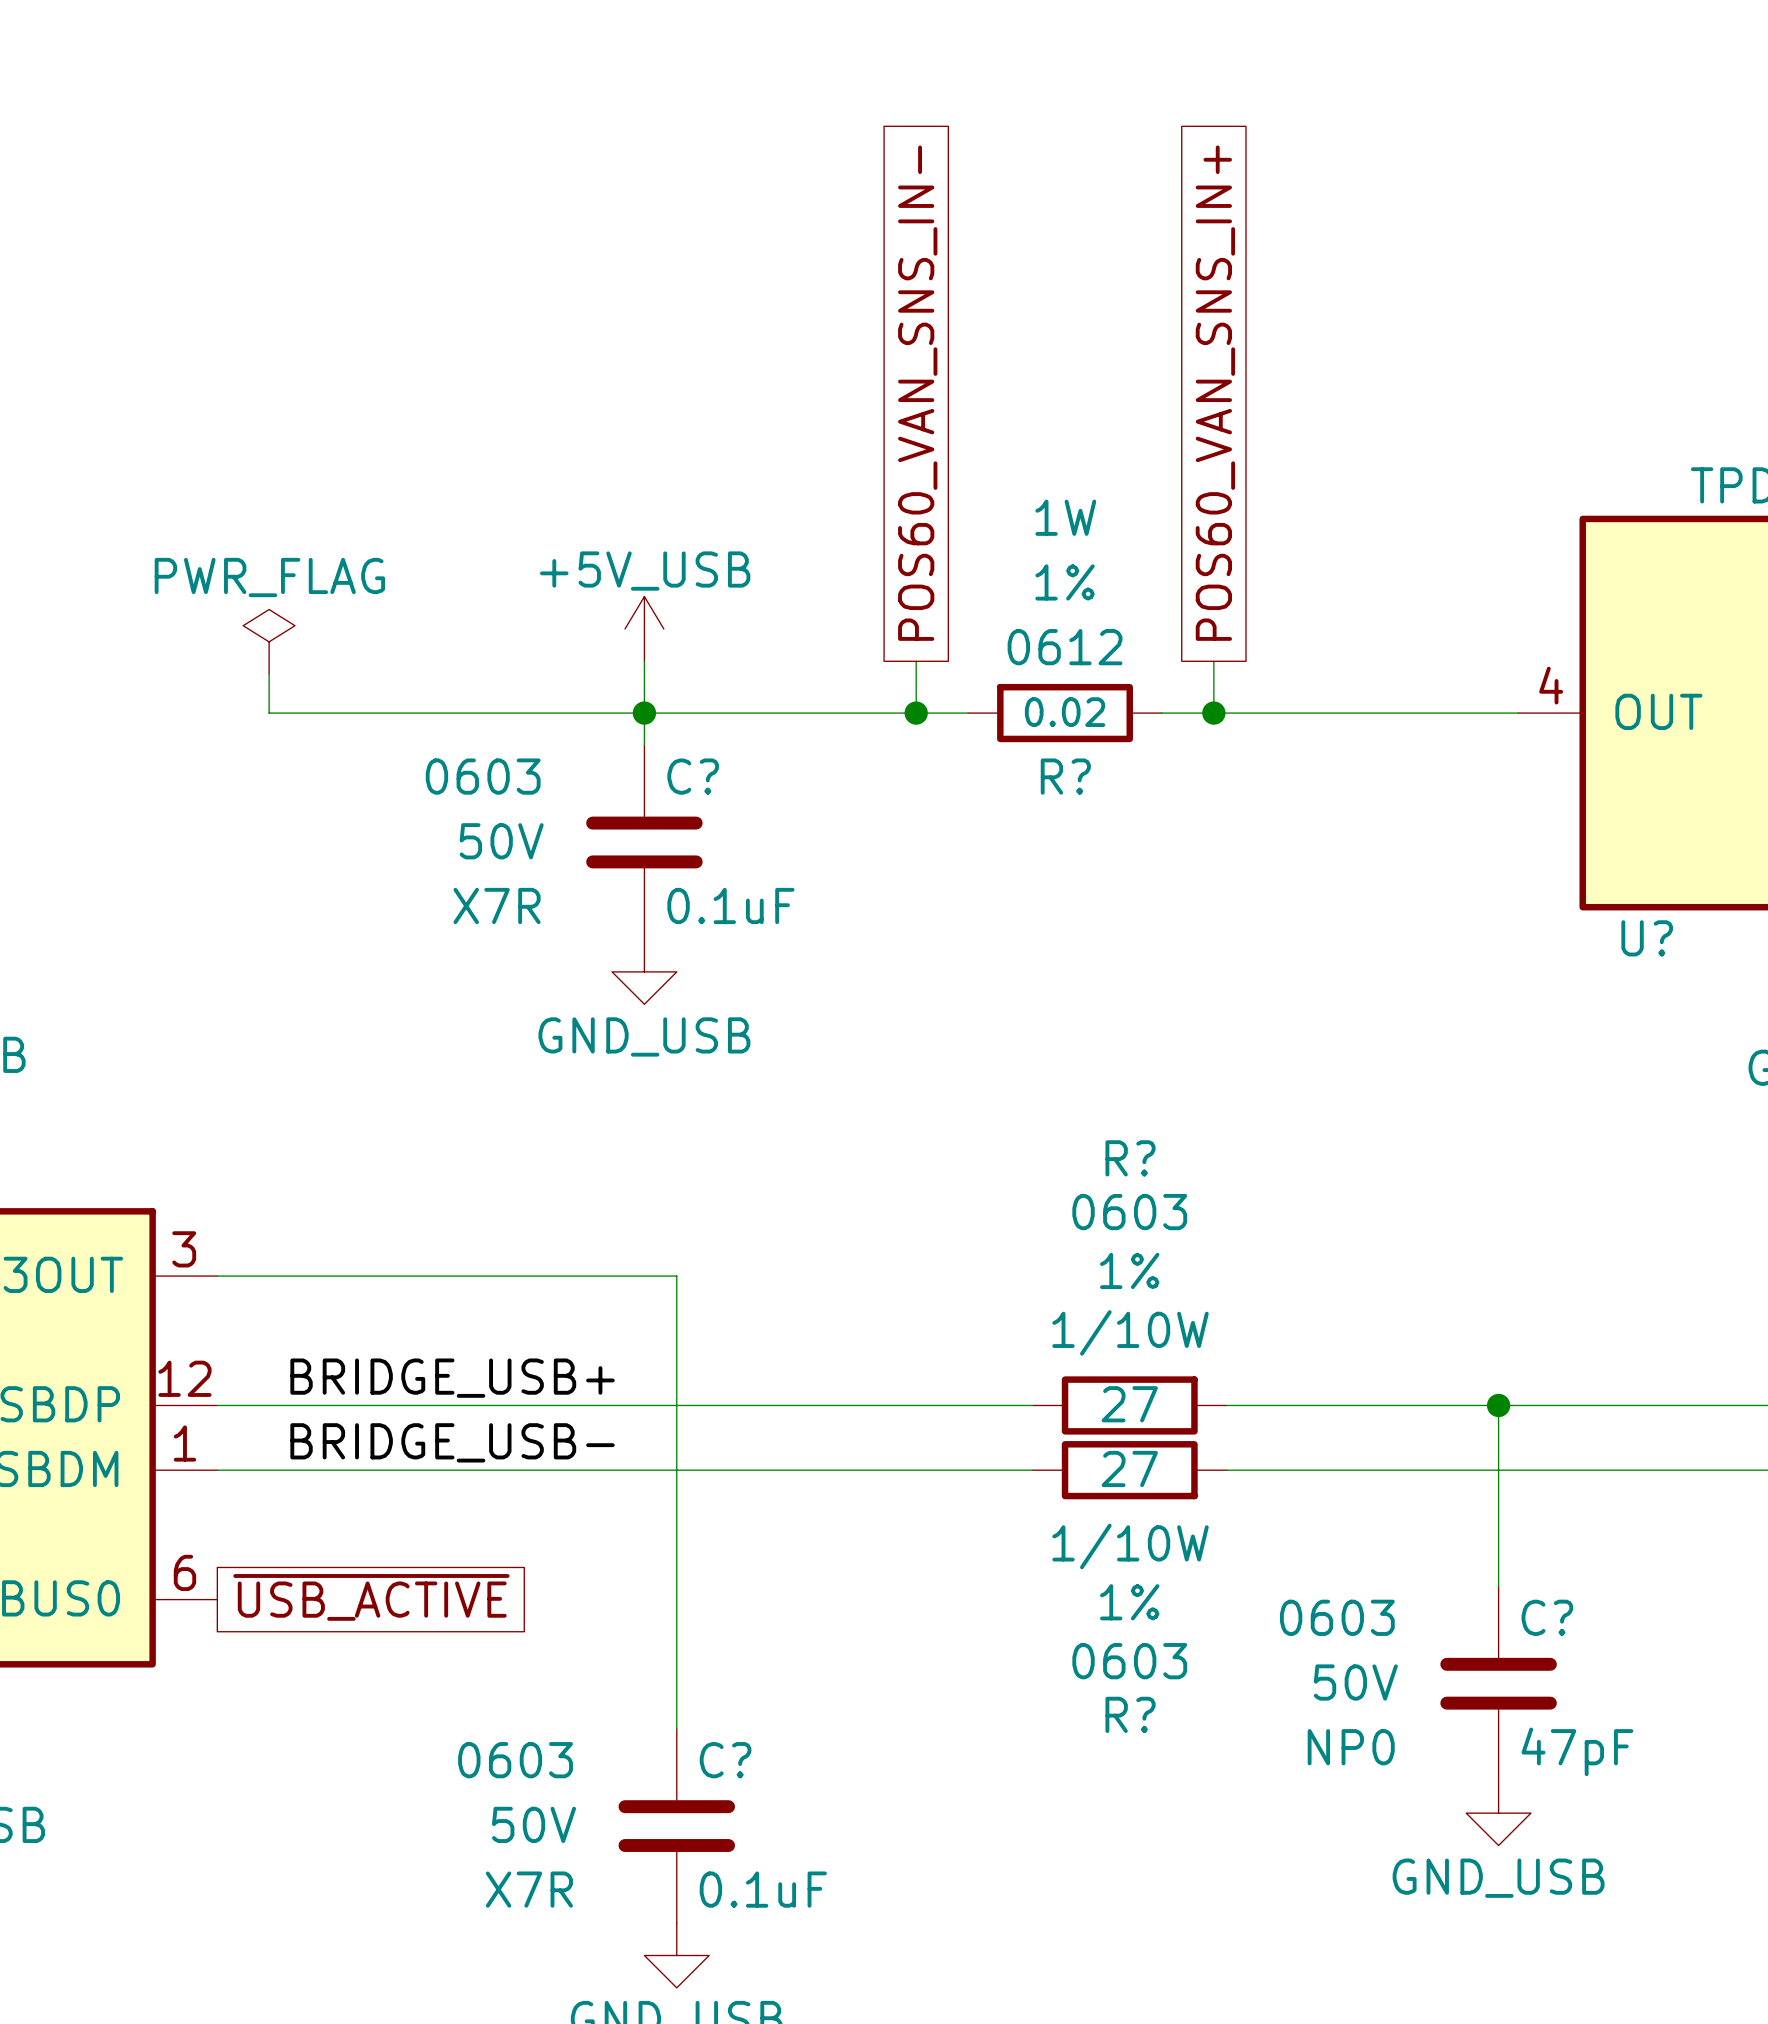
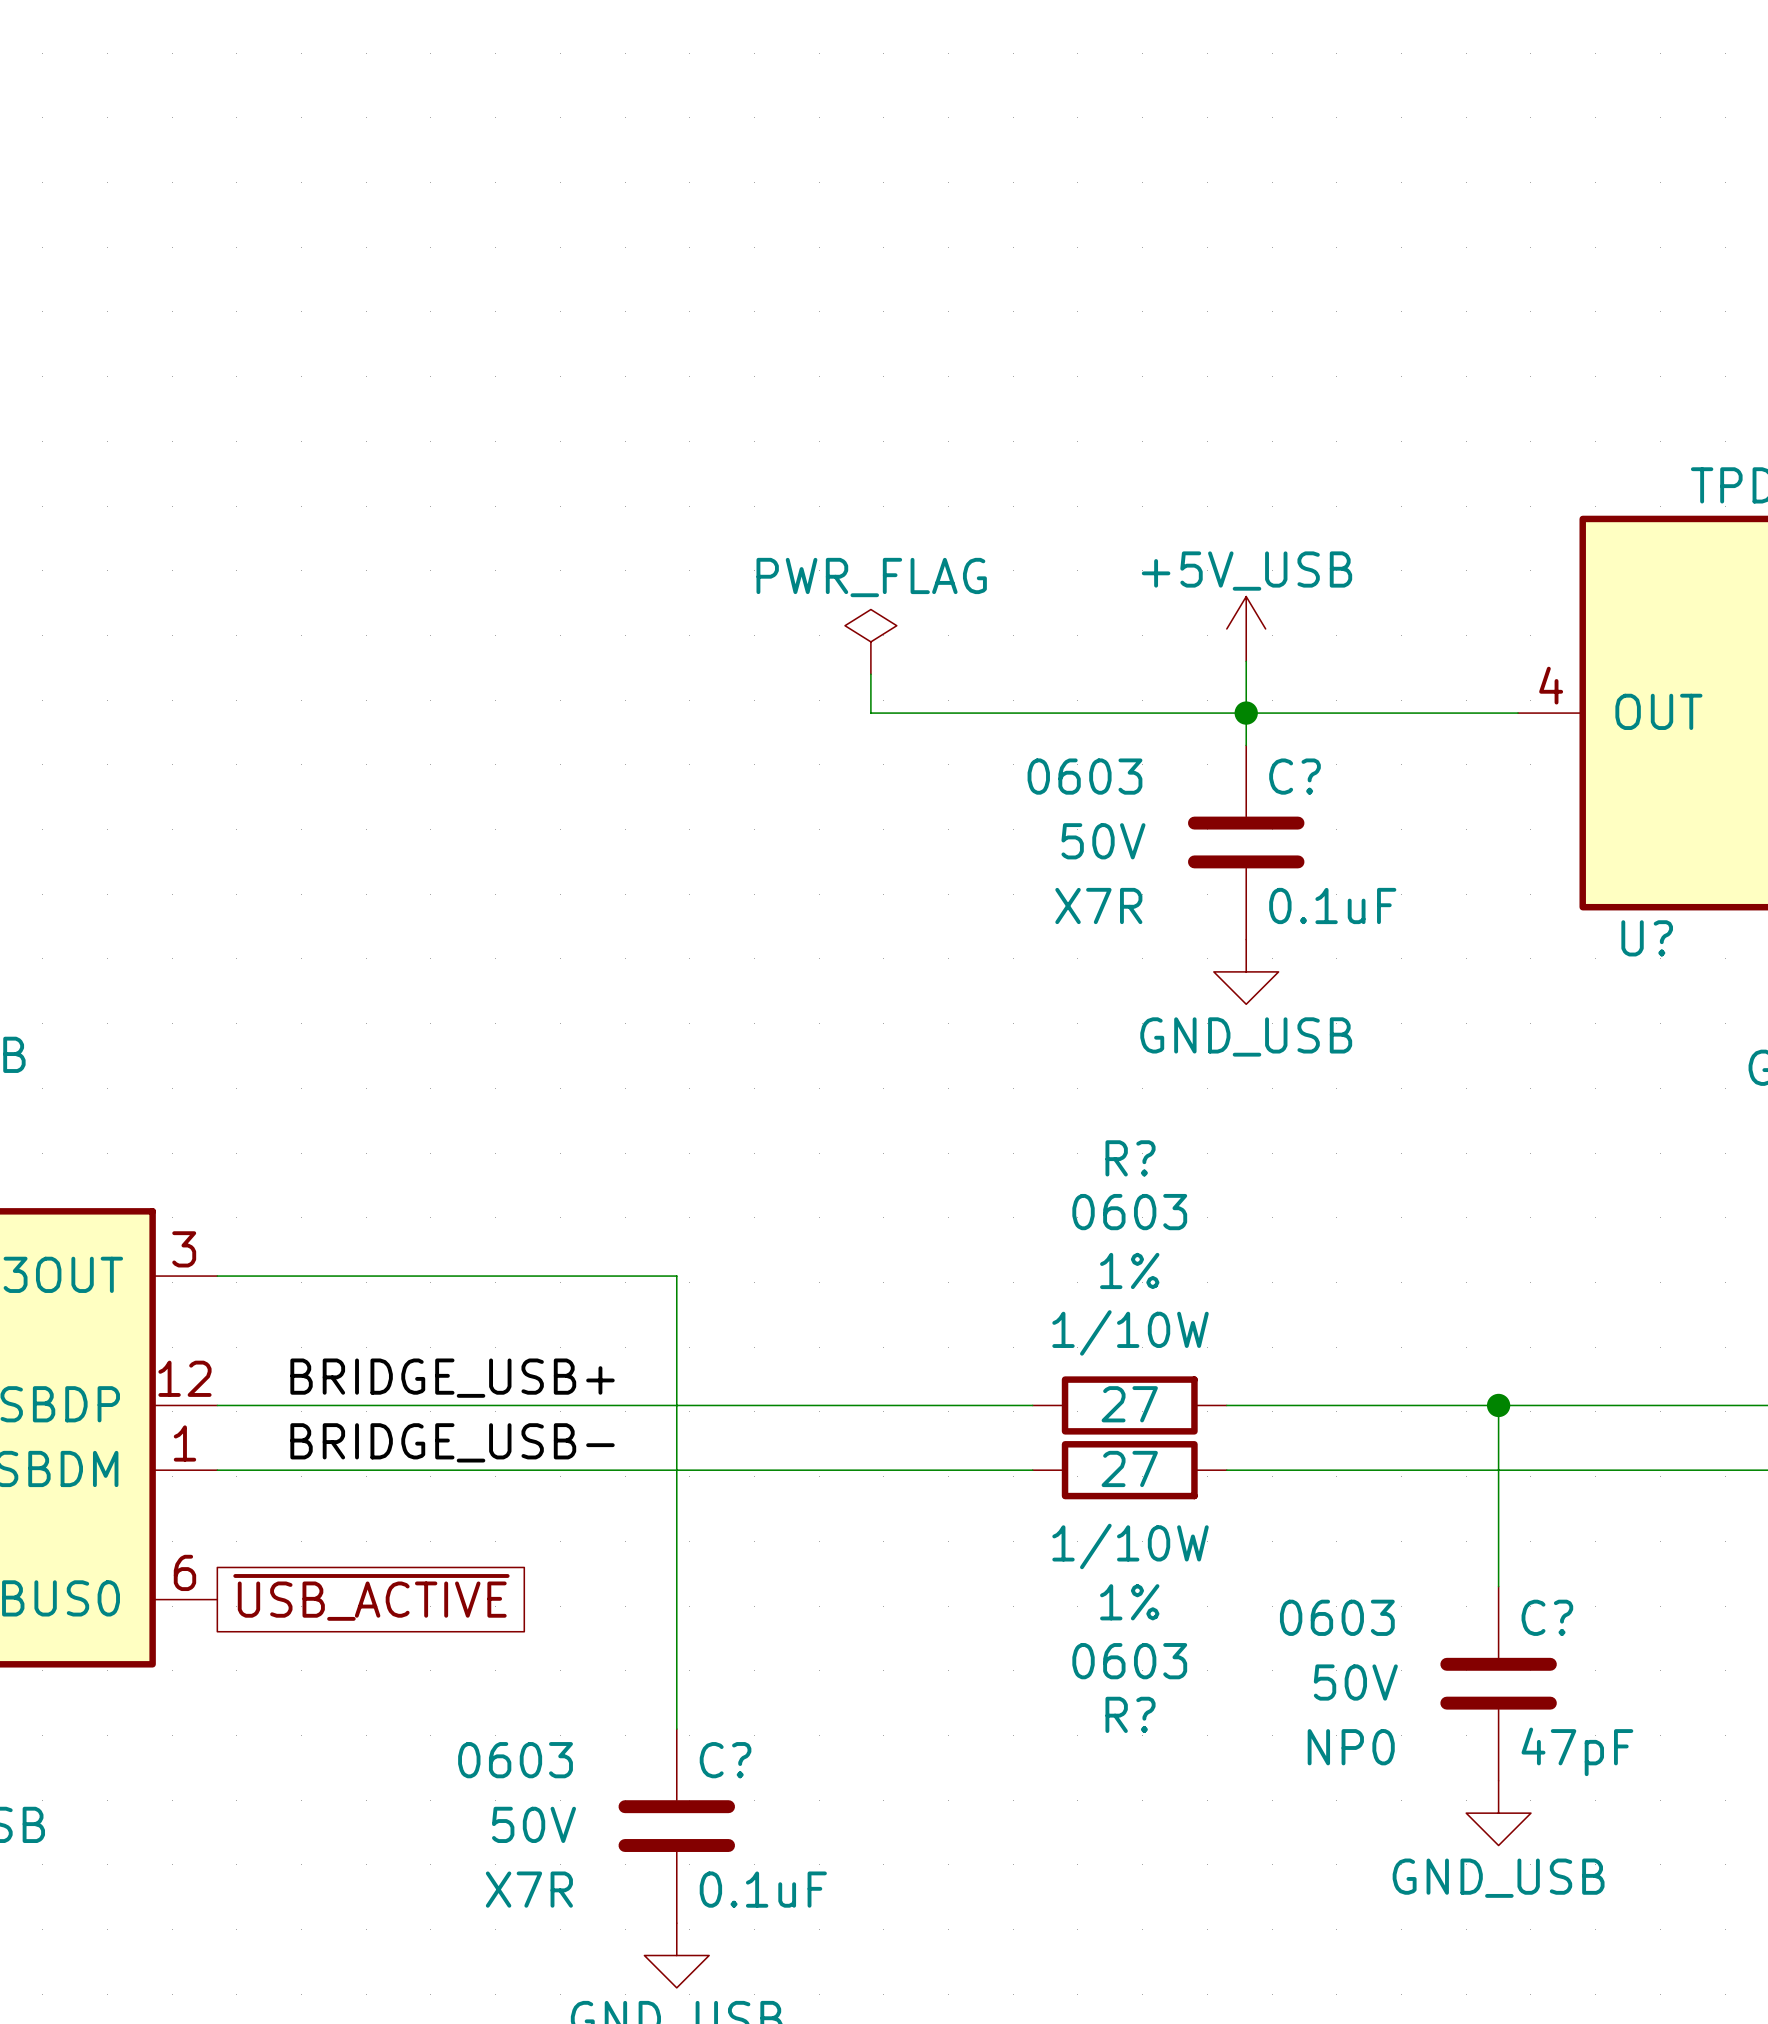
global label: POS60_VAN_SNS_IN- (917, 393) -> none
global label: POS60_VAN_SNS_IN+ (1215, 393) -> none
power symbol position: +5V_USB (644, 628) -> +5V_USB (1246, 628)
power symbol position: PWR_FLAG (269, 641) -> PWR_FLAG (870, 641)
wire: (644, 661) (644, 745) -> (1246, 661) (1246, 745)
wire: (916, 661) (916, 713) -> none
wire: (1213, 661) (1213, 713) -> none
wire: (269, 674) (269, 713) (870, 713) -> (870, 674) (870, 713)
junction: (644, 713) -> none
junction: (916, 713) -> none
wire: none -> (967, 713) (1162, 713)
R?: 0.02 (1065, 713) -> none
junction position: (1213, 713) -> (1246, 713)
C? position: (644, 842) -> (1246, 842)
power symbol position: GND_USB (644, 971) -> GND_USB (1246, 971)

